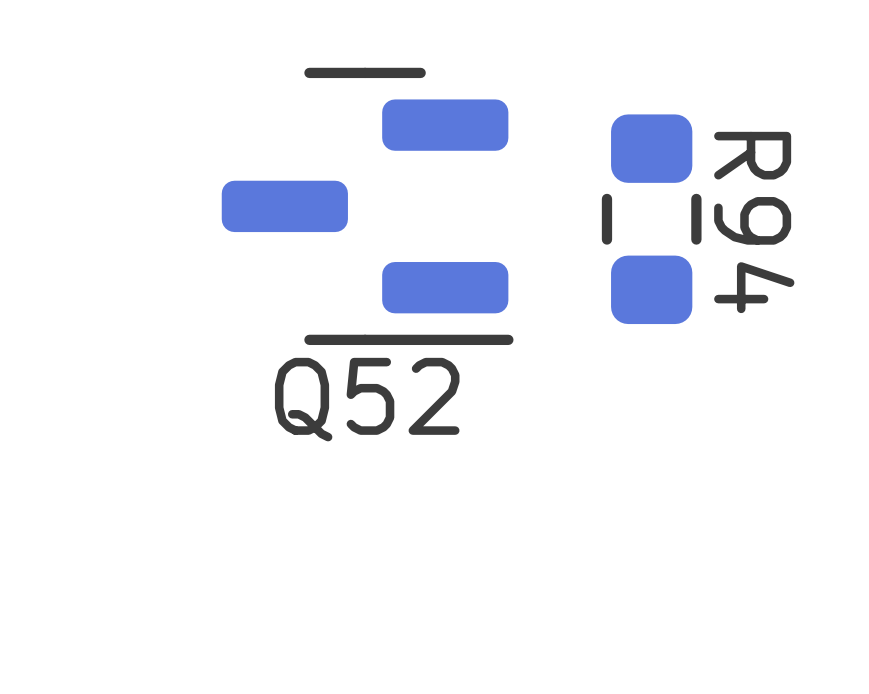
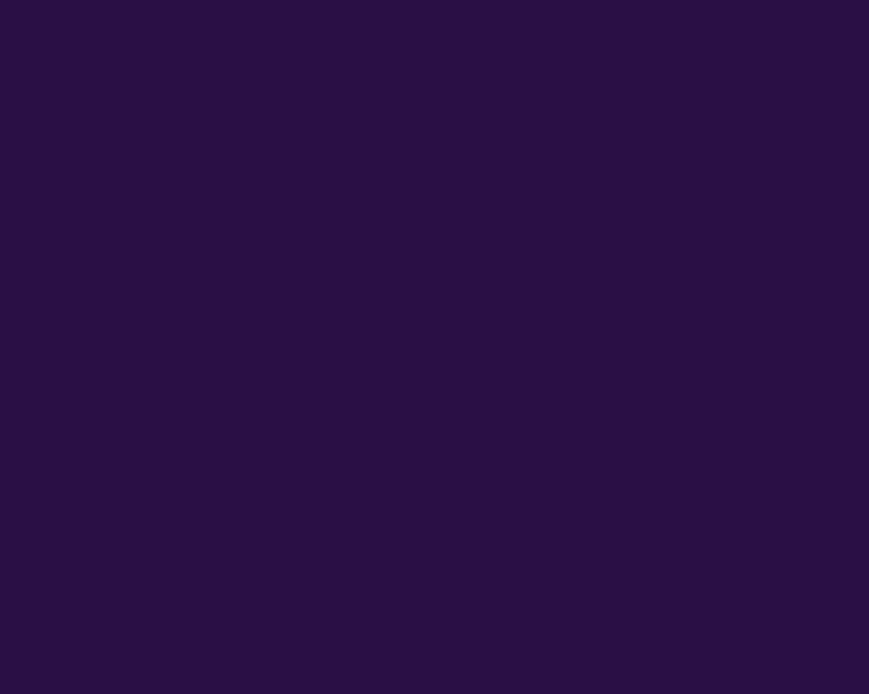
Q52: (367, 206) -> none
R94: (651, 219) -> none

